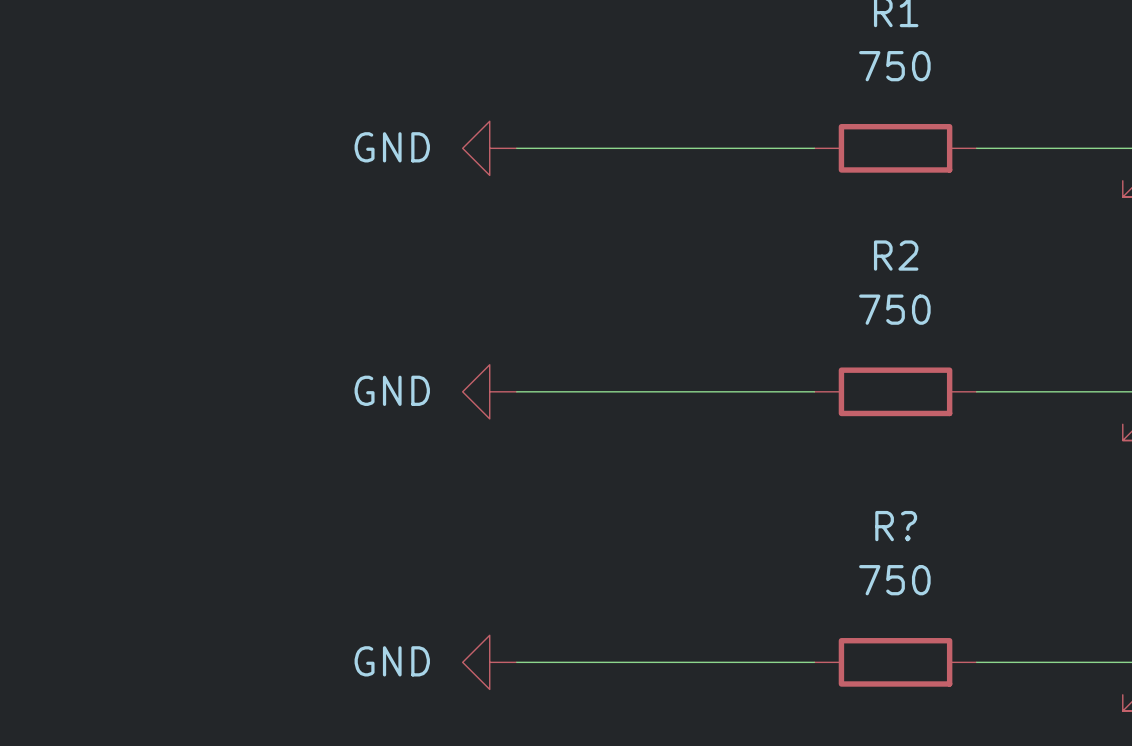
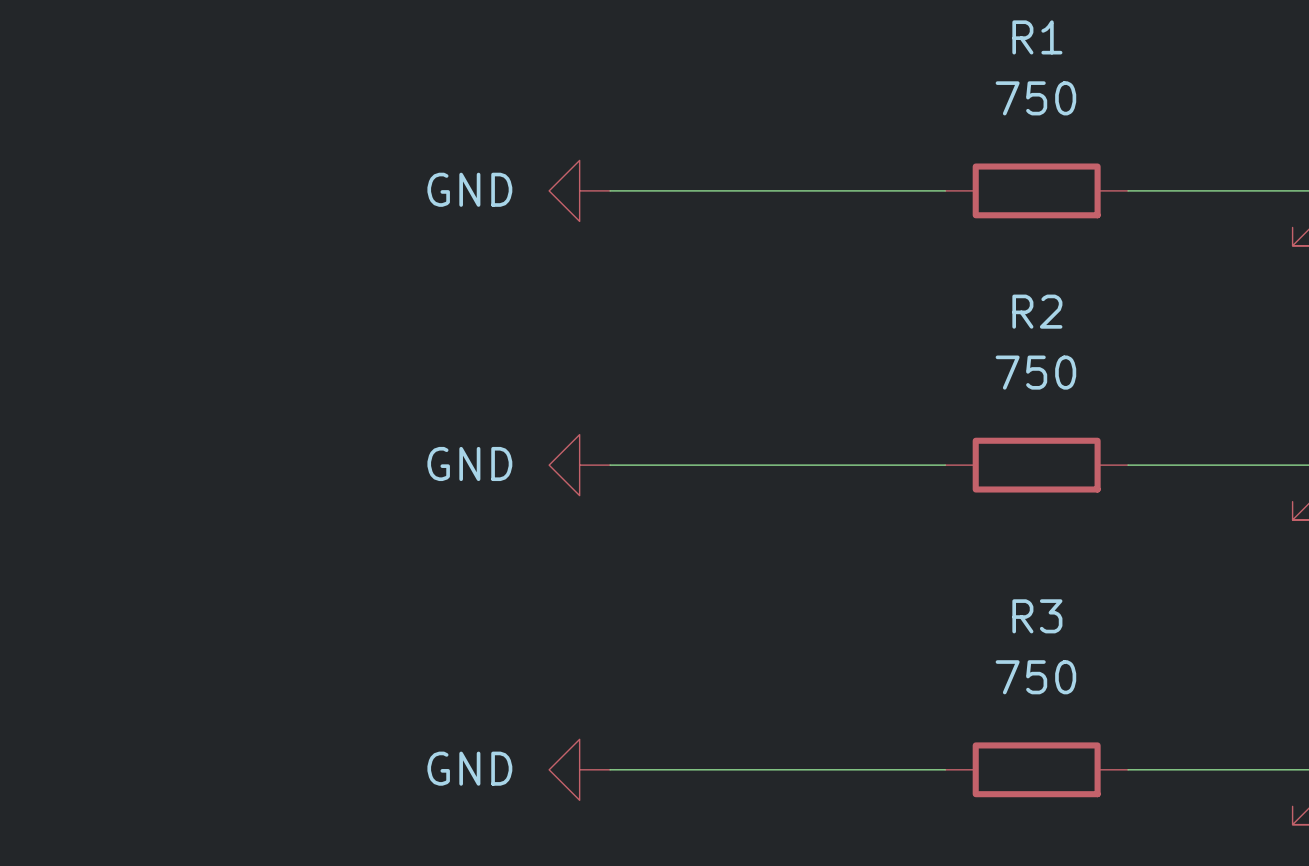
R? name: R? (896, 526) -> R3 (1037, 616)

